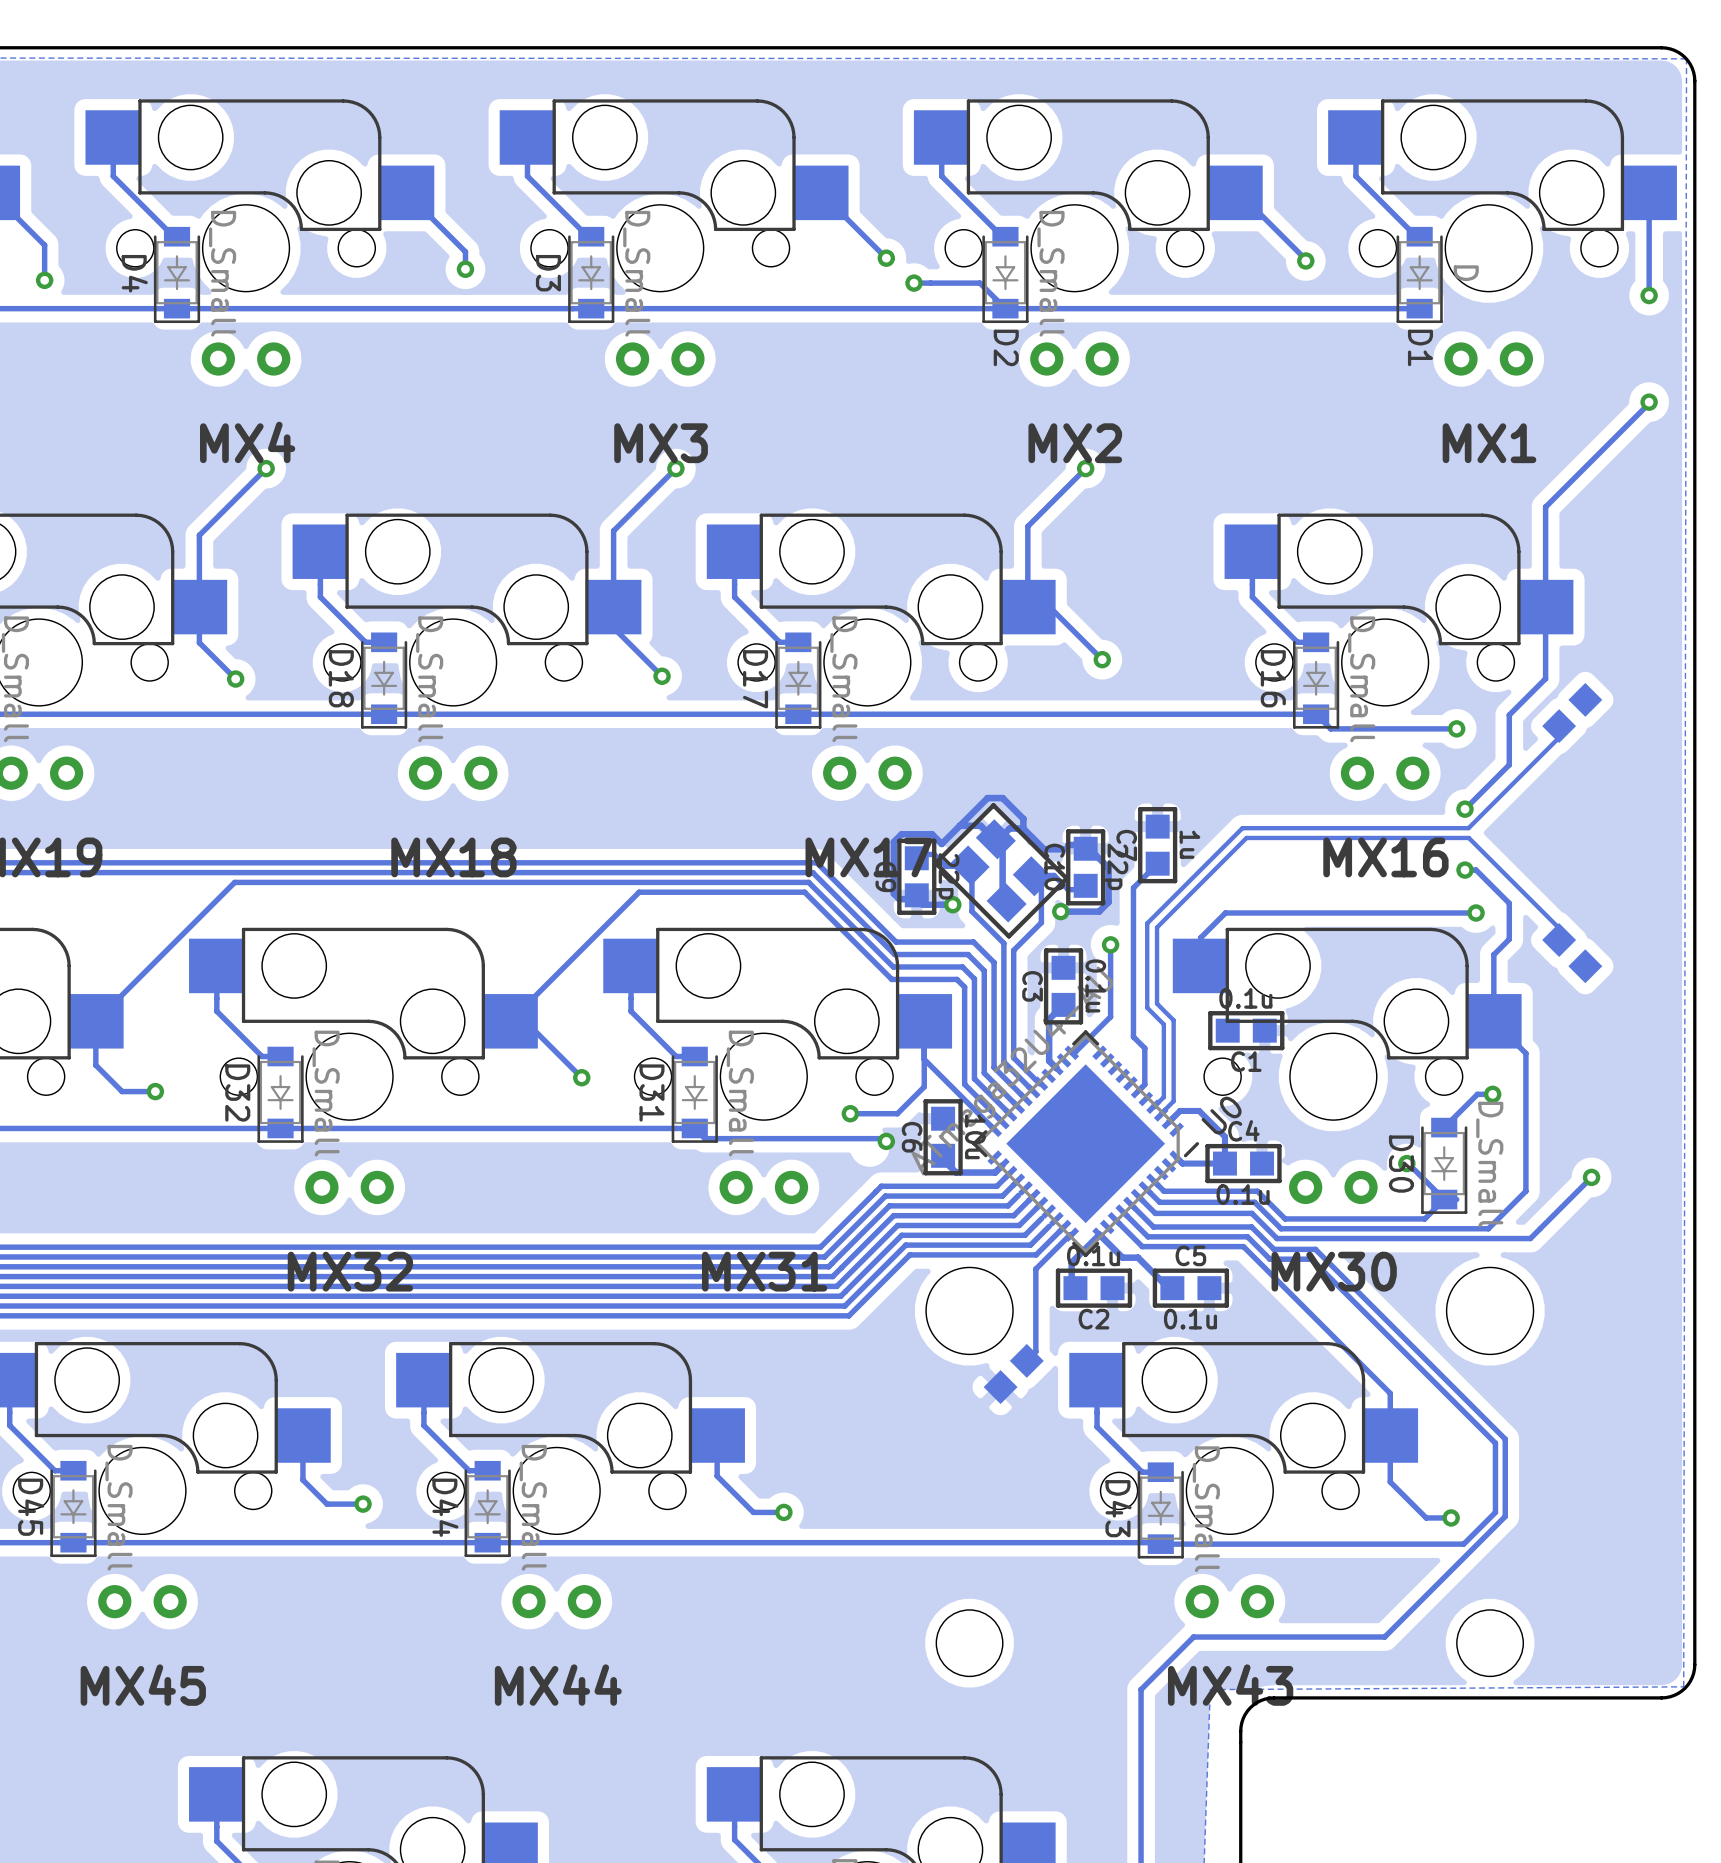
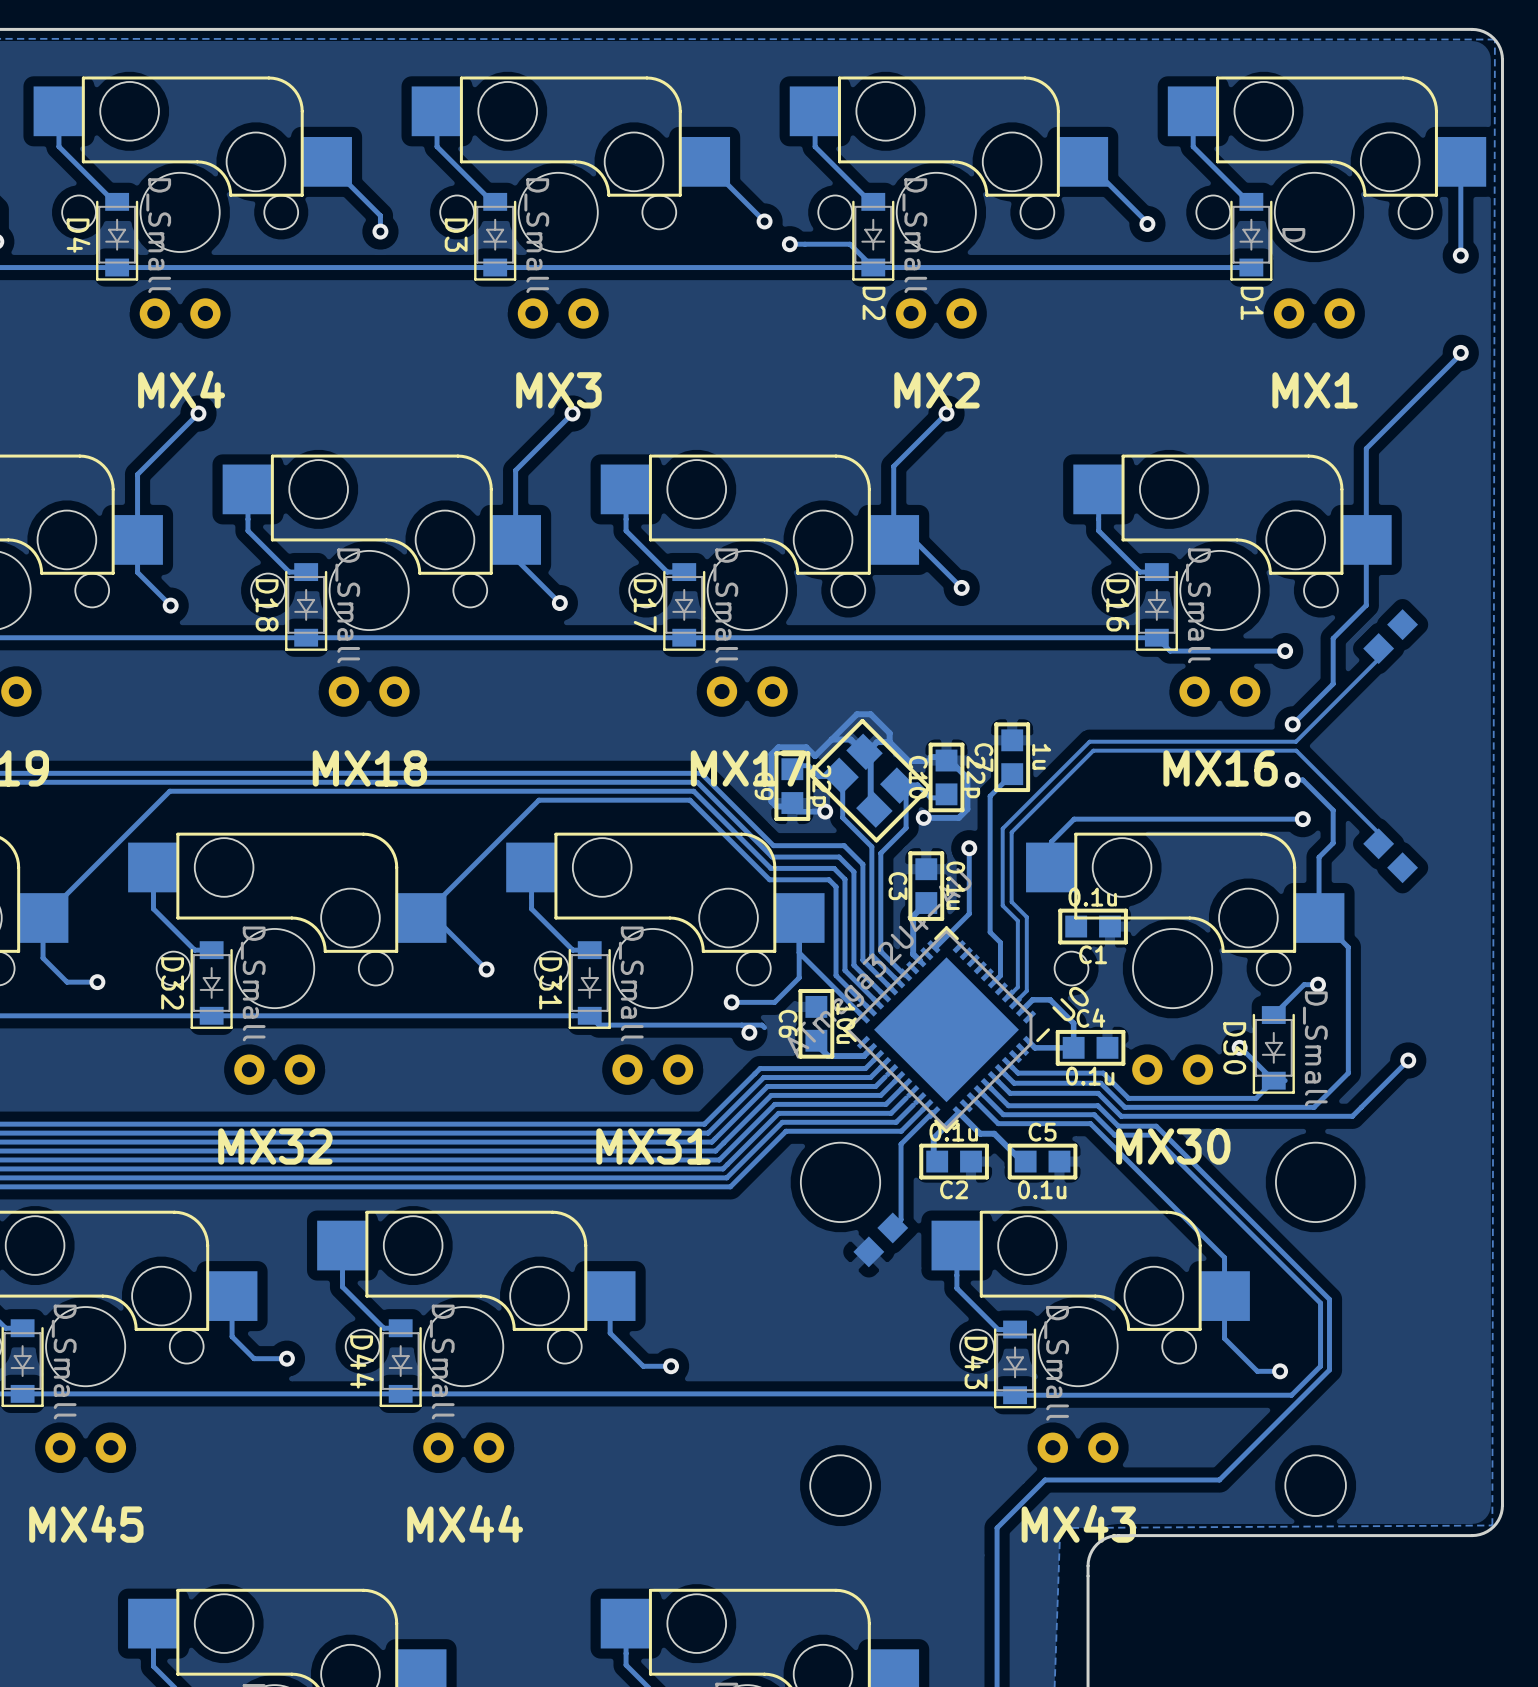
via position: (886, 1141) -> (749, 1032)

